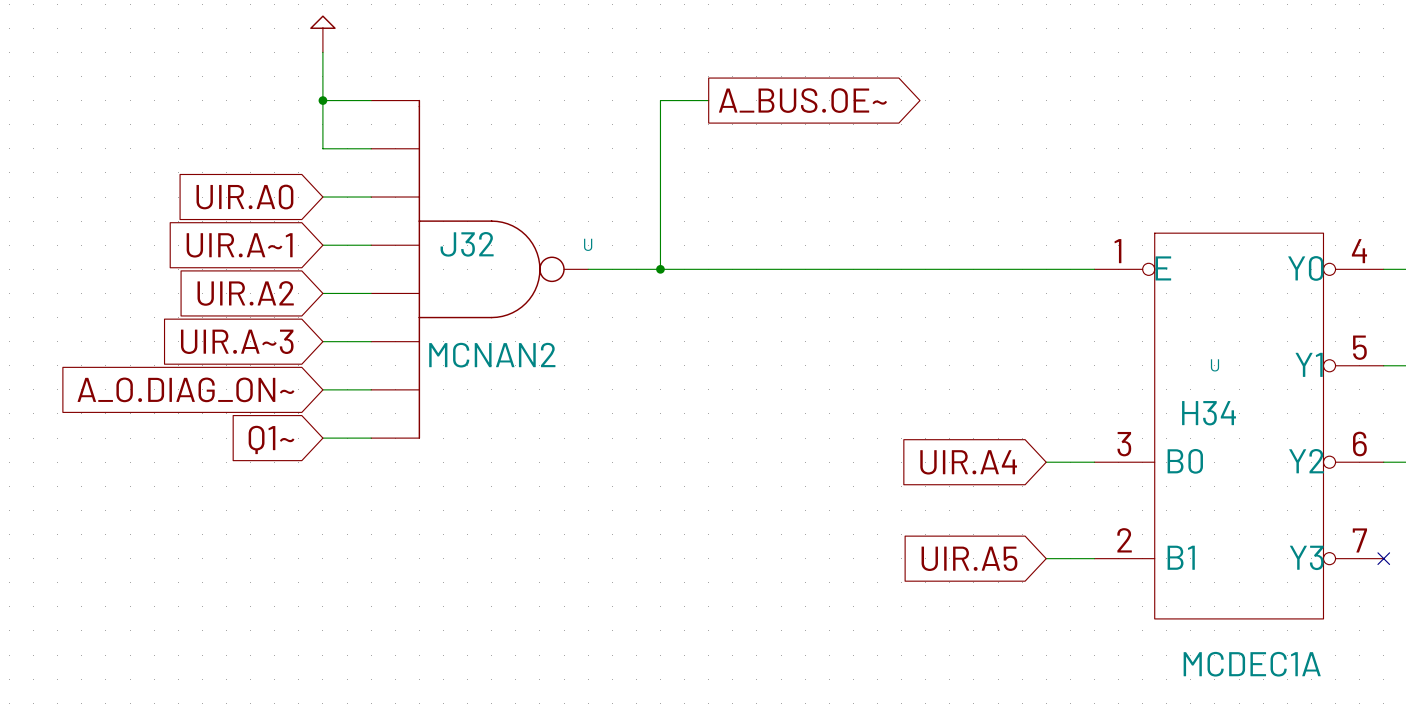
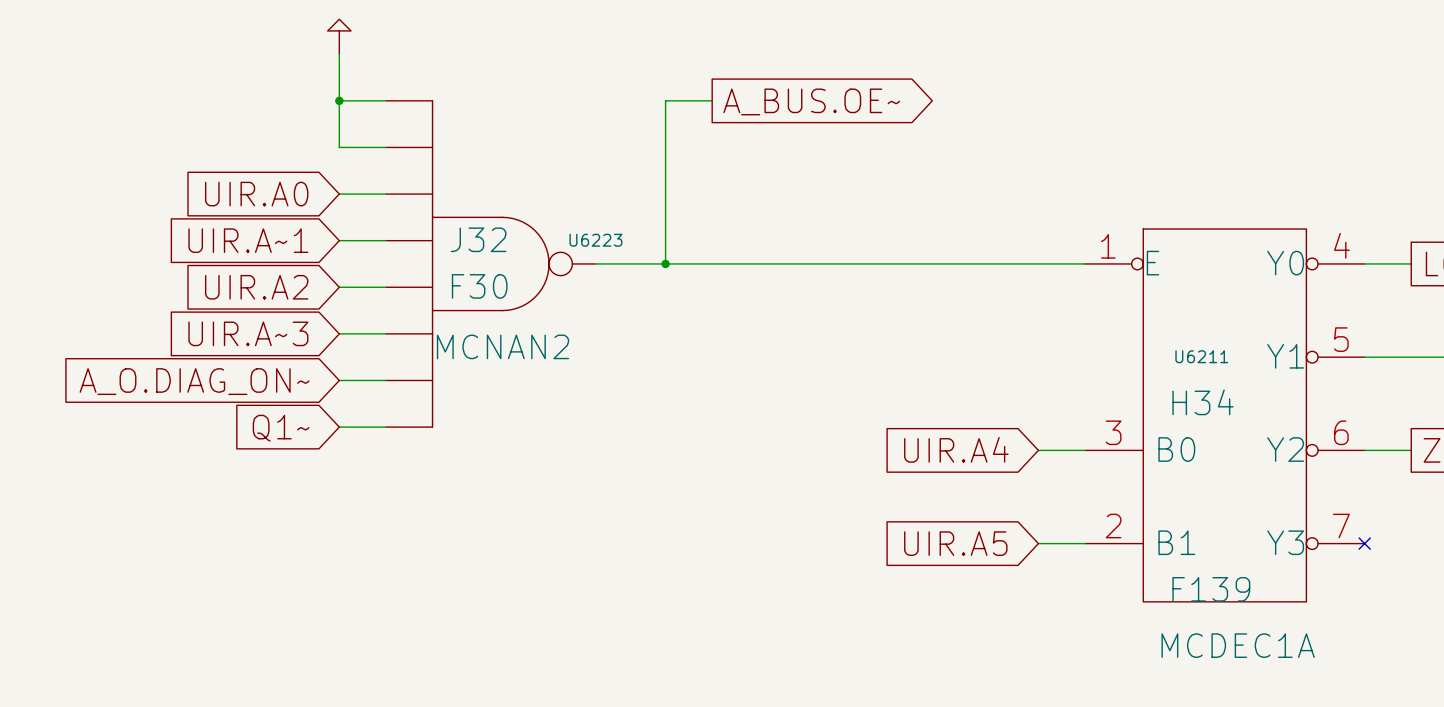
U name: U (588, 244) -> U6223 (595, 240)
U value: none -> F30 (479, 286)
U name: U (1214, 365) -> U6211 (1201, 356)
U value: none -> F139 (1211, 589)

